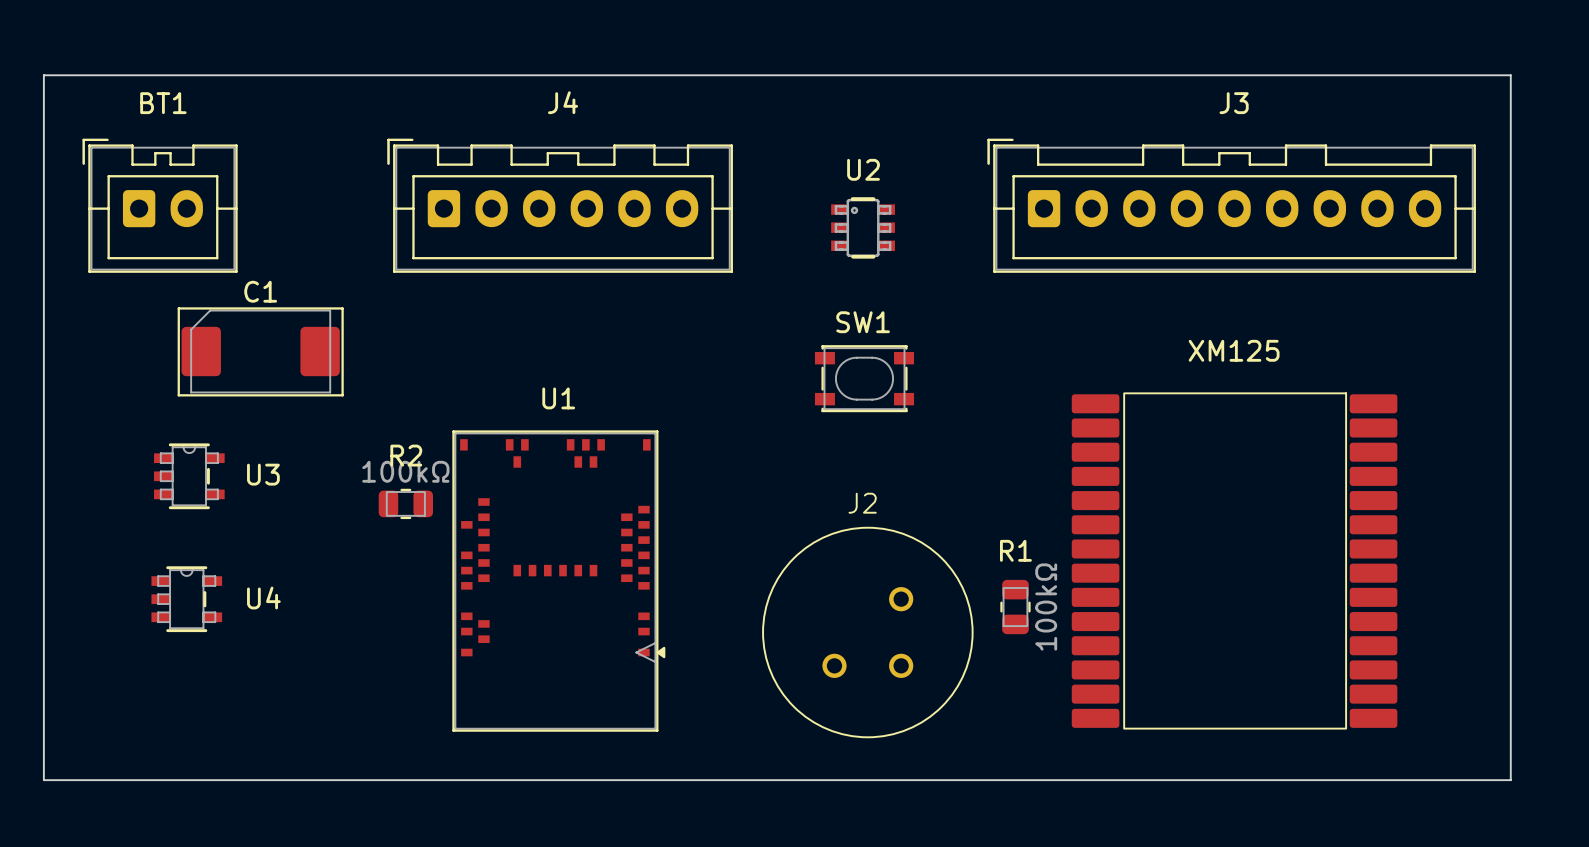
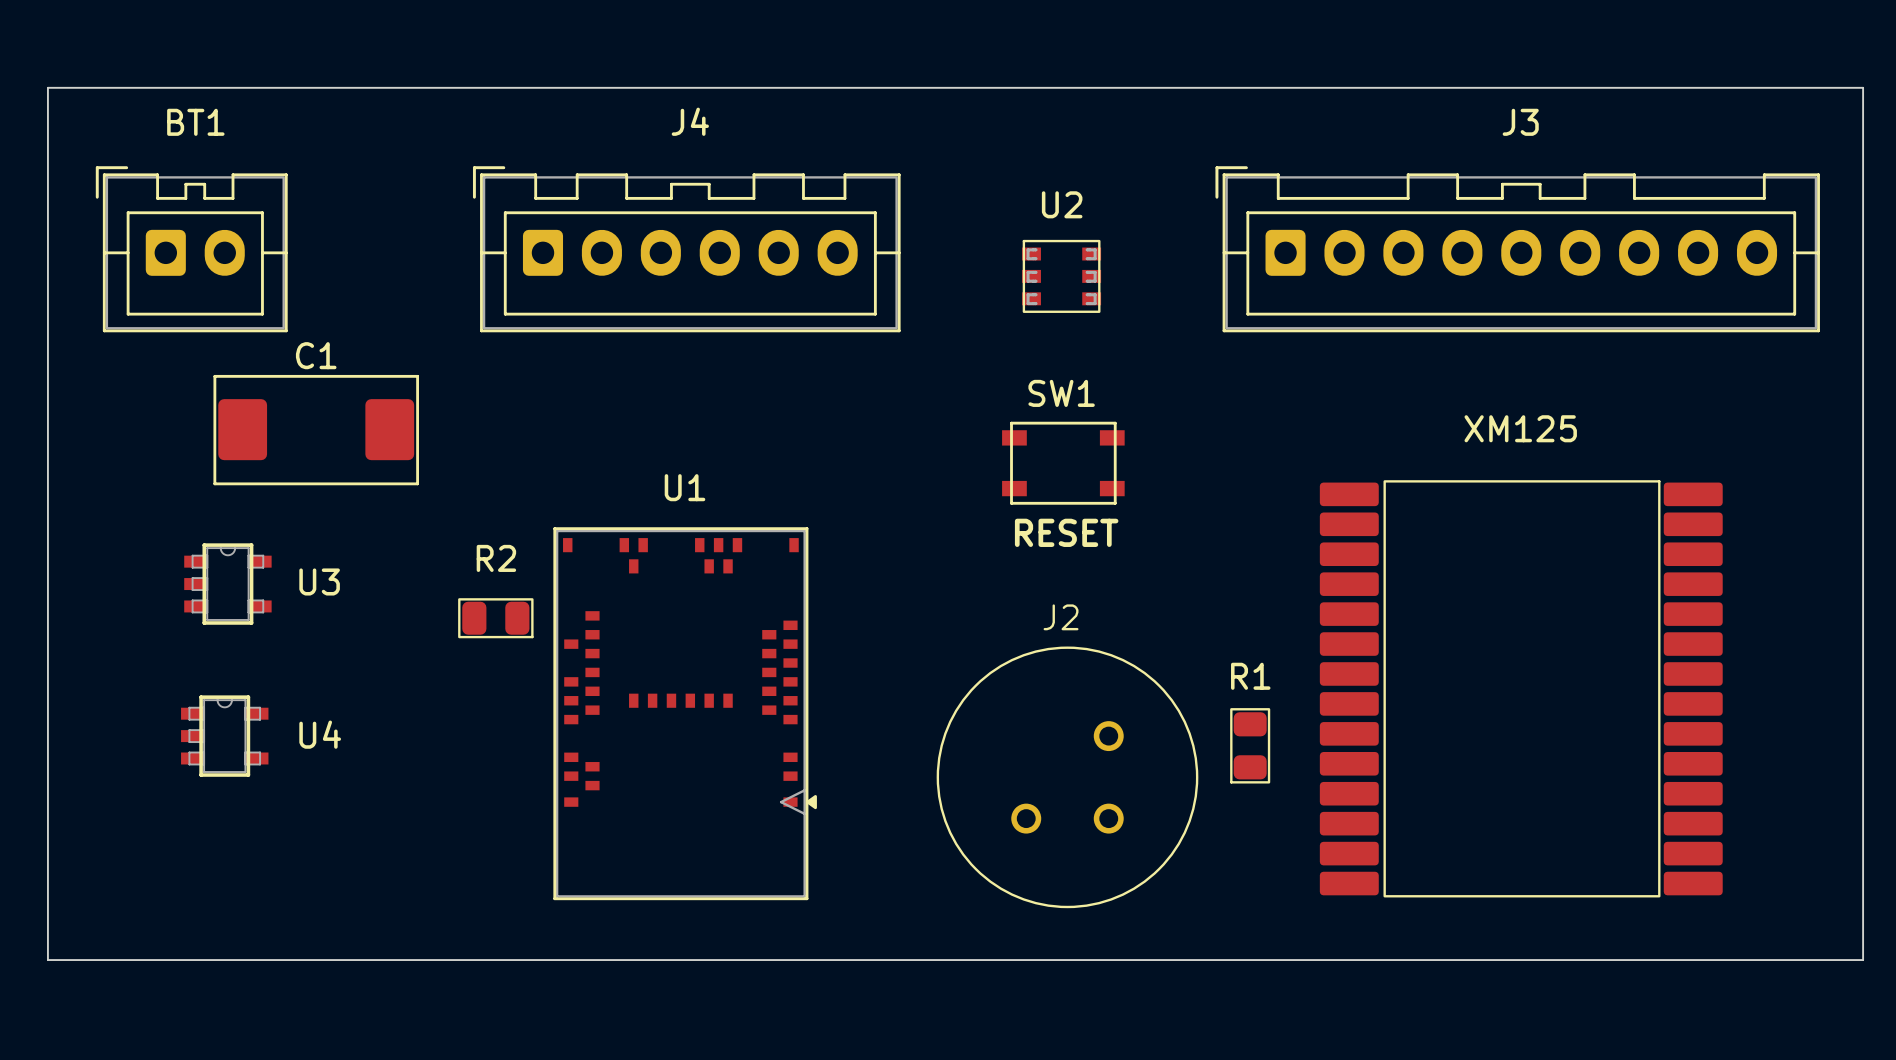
U2 footprint: [831, 197, 895, 259] -> [1022, 239, 1102, 313]
C1 footprint: [177, 307, 344, 397] -> [213, 374, 419, 486]
SW1 footprint: [814, 345, 915, 413] -> [1002, 421, 1125, 505]
text: none -> RESET (1066, 532)
part footprint: [154, 443, 225, 510] -> [184, 543, 272, 625]
R2 value: 100kΩ (405, 471) -> none
R2 footprint: [378, 488, 434, 520] -> [458, 598, 534, 639]
U4 footprint: [151, 566, 223, 633] -> [181, 695, 269, 777]
R1 footprint: [1000, 579, 1031, 635] -> [1230, 708, 1271, 784]
R1 value: 100kΩ (1046, 607) -> none

